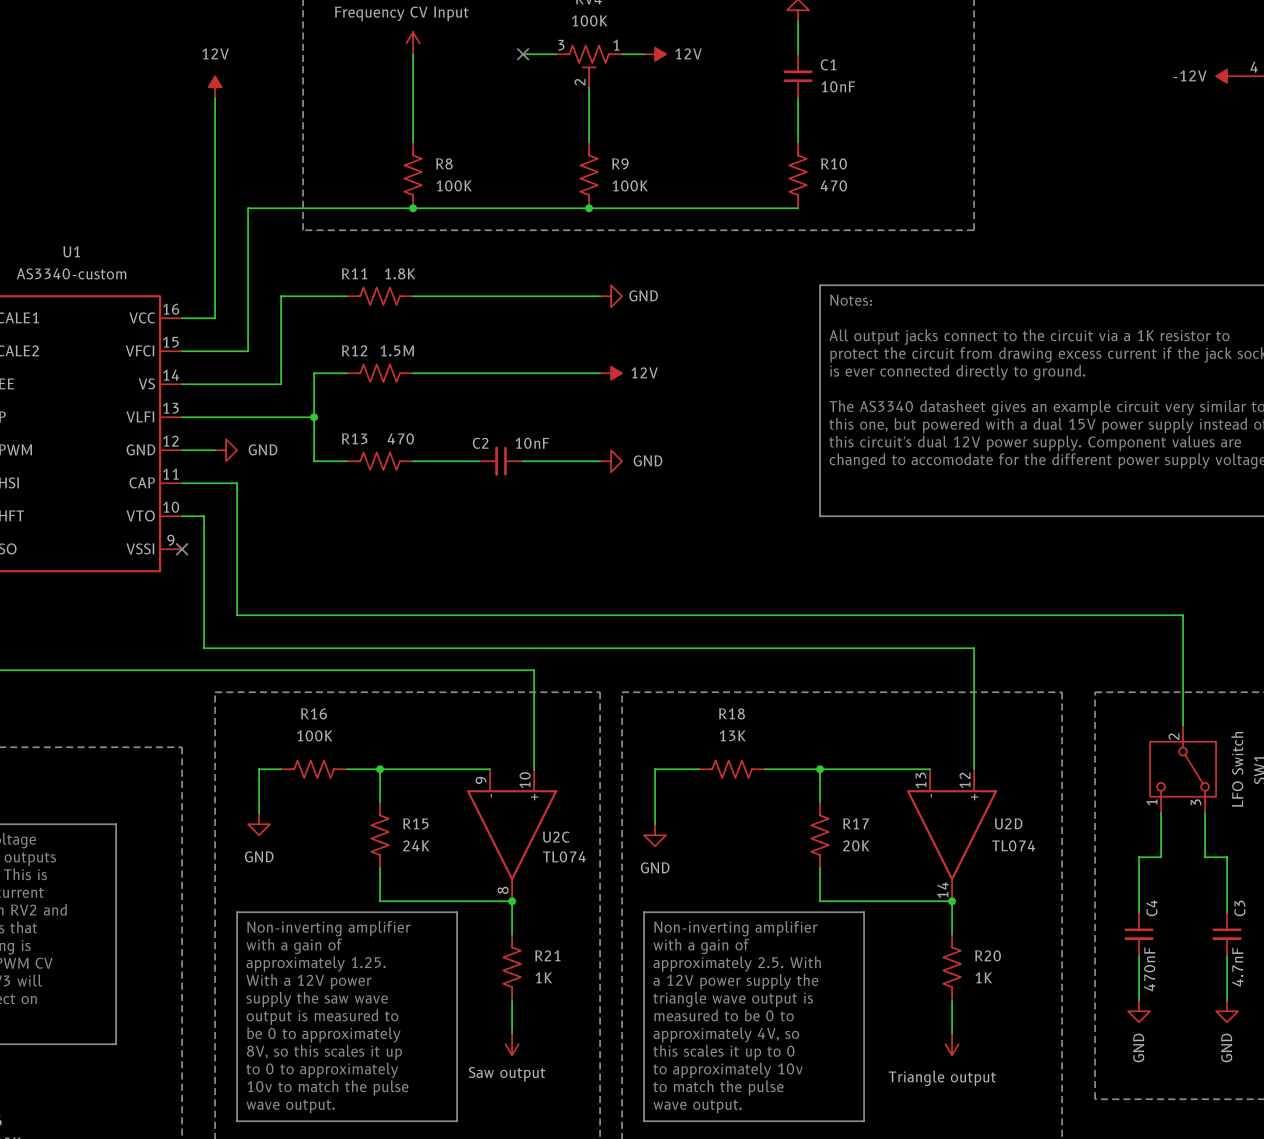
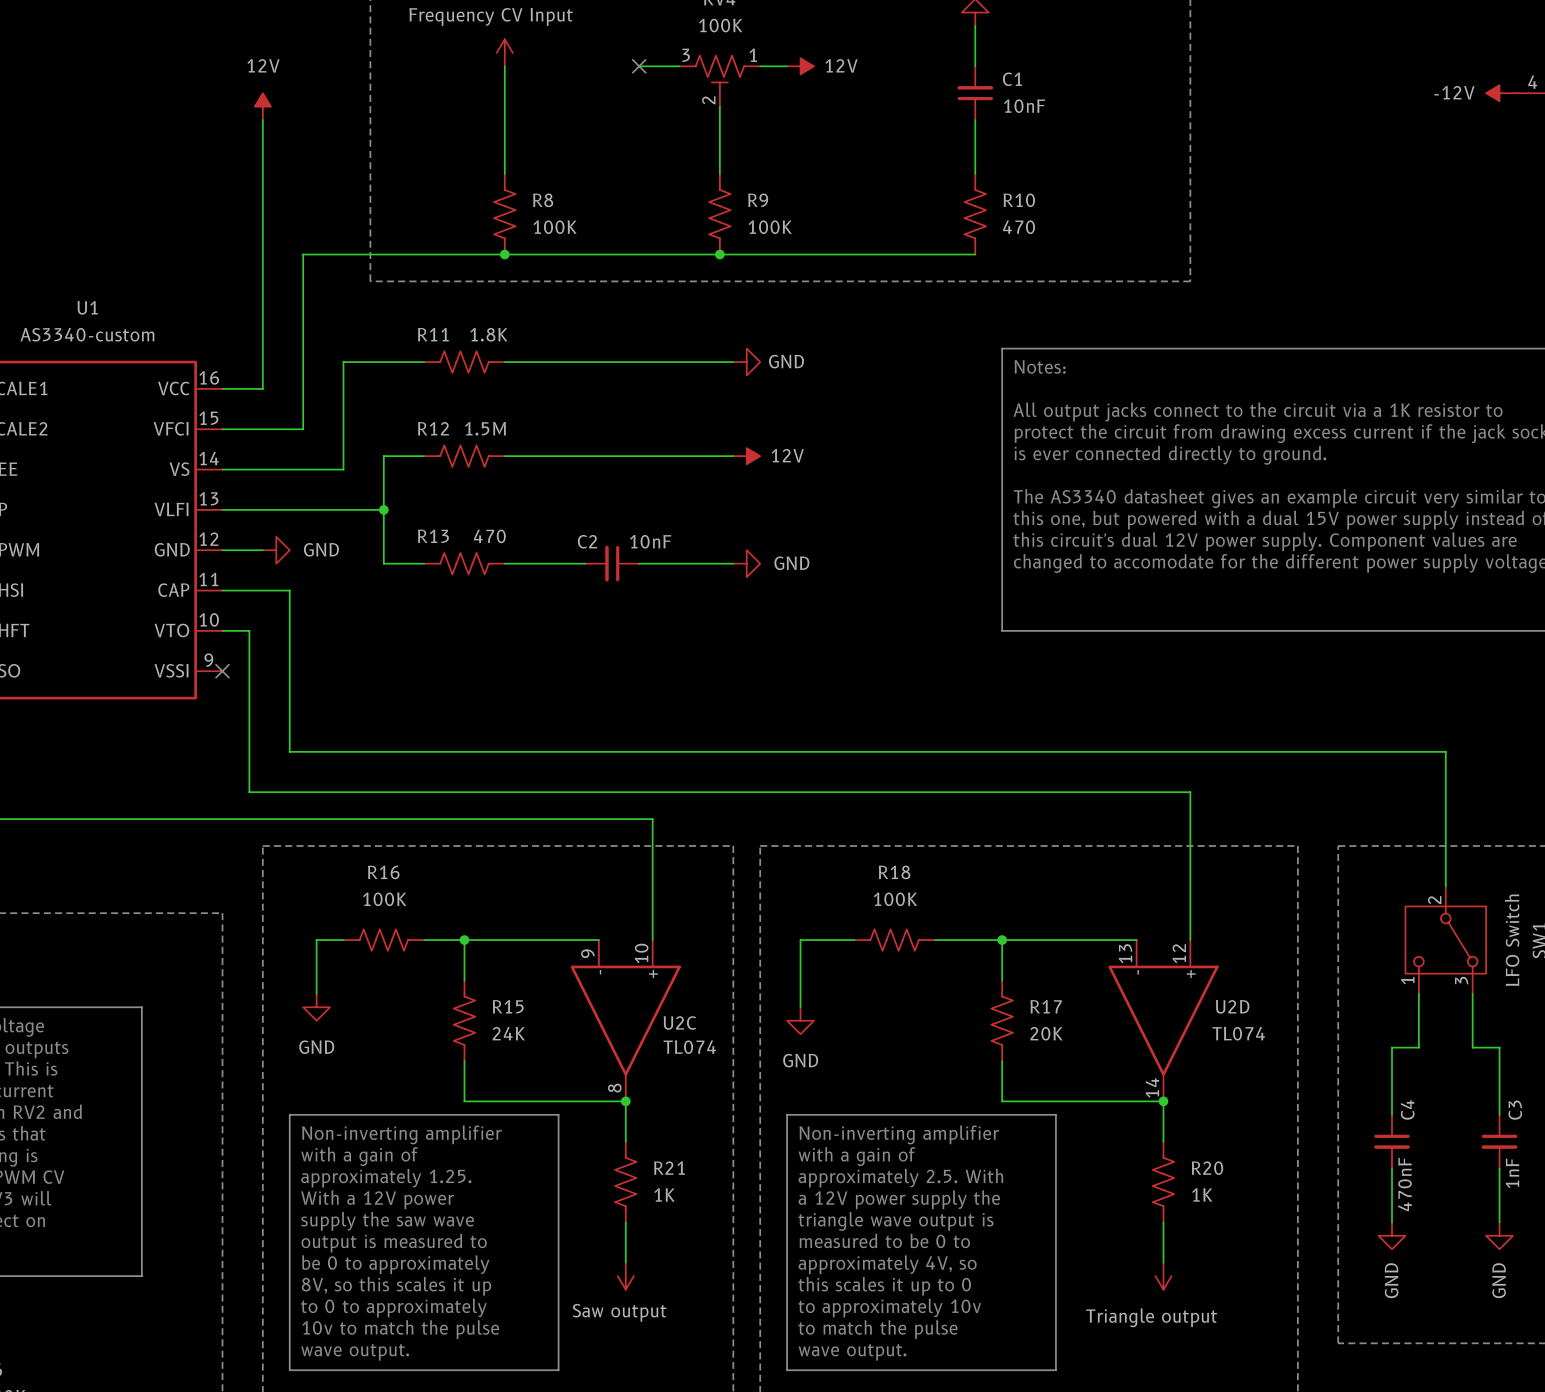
R18 value: 13K (732, 735) -> 100K (895, 899)
C3 value: 4.7nF (1237, 967) -> 1nF (1512, 1173)

